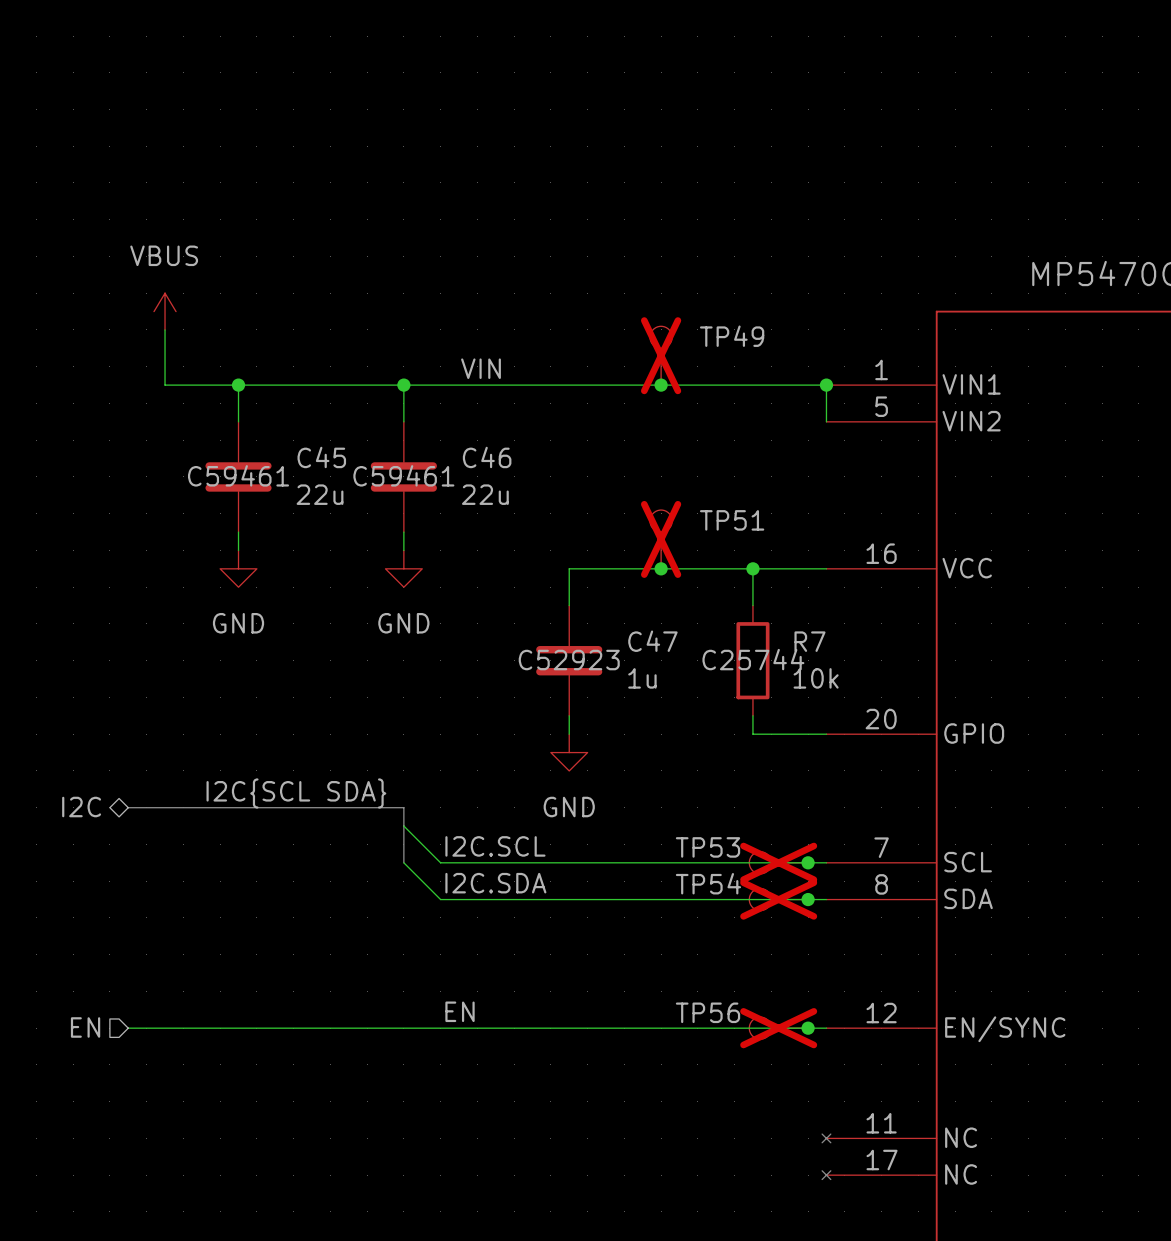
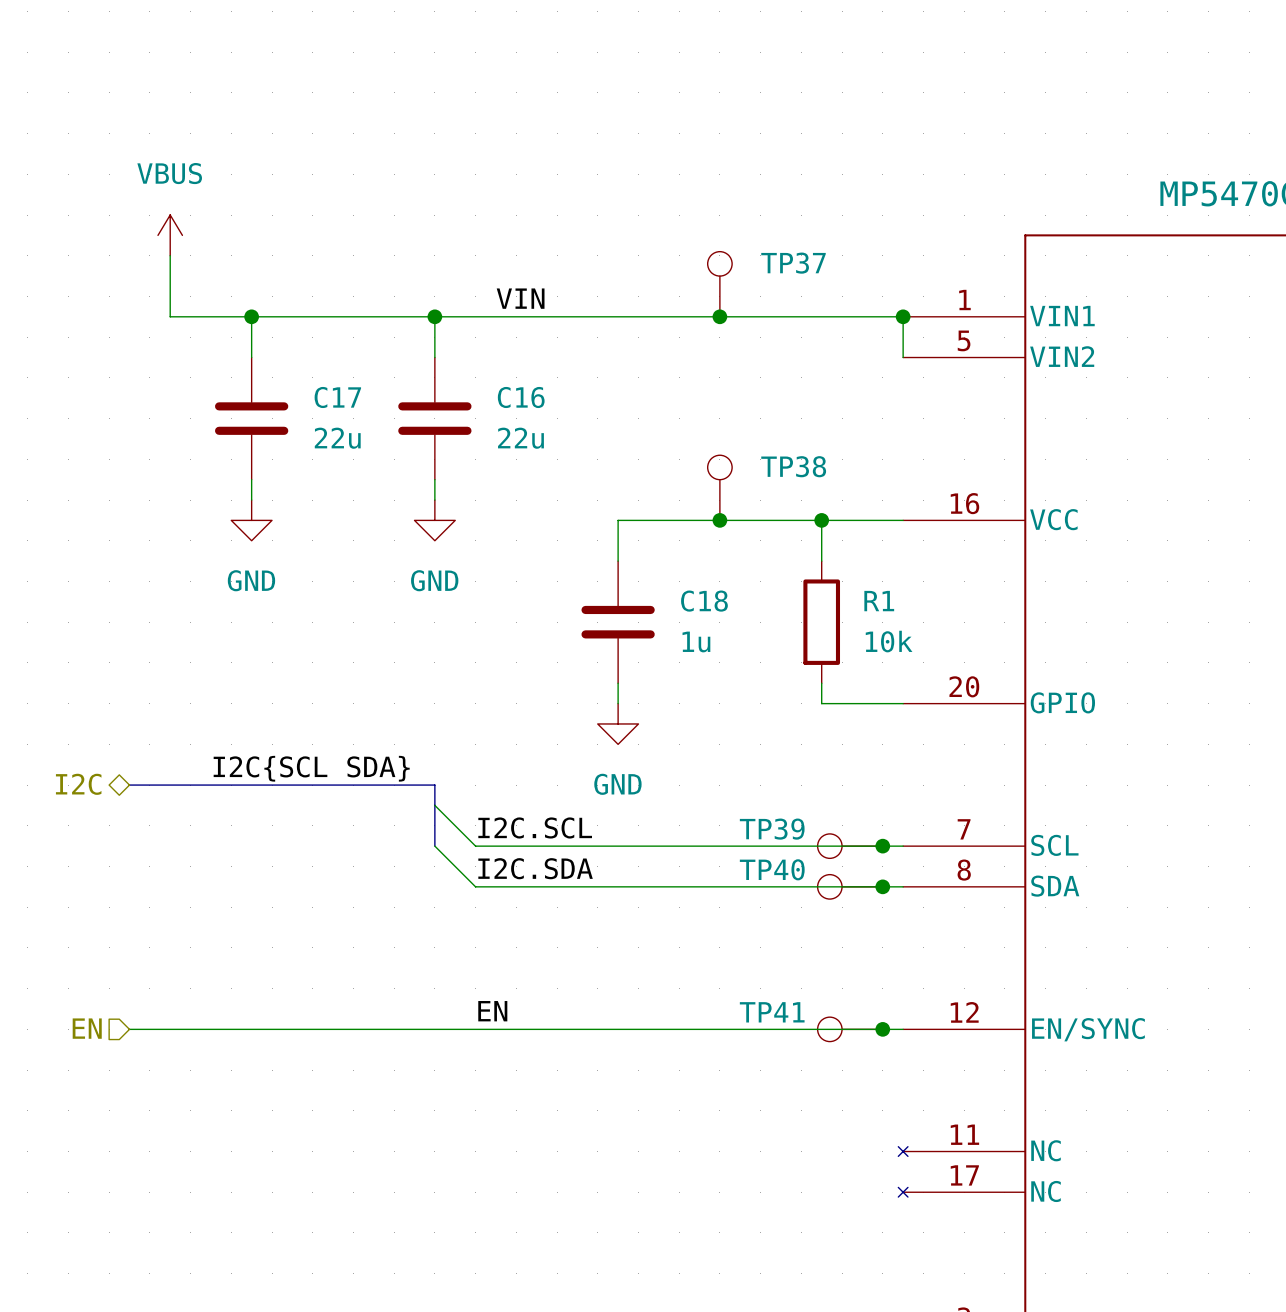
TP49 name: TP49 (732, 336) -> TP37 (793, 263)
TP49 do-not-place cross: (661, 355) -> none
C45 name: C45 (321, 457) -> C17 (337, 397)
C46 name: C46 (487, 457) -> C16 (521, 397)
C45 text: C59461 (238, 475) -> none
C46 text: C59461 (403, 475) -> none
TP51 name: TP51 (732, 520) -> TP38 (793, 466)
TP51 do-not-place cross: (661, 539) -> none
C47 name: C47 (652, 641) -> C18 (704, 601)
R7 name: R7 (809, 641) -> R1 (879, 601)
R7 text: C25744 (753, 659) -> none
C47 text: C52923 (569, 660) -> none
TP53 name: TP53 (708, 847) -> TP39 (772, 829)
TP53 do-not-place cross: (778, 862) -> none
TP54 name: TP54 (708, 883) -> TP40 (772, 869)
TP54 do-not-place cross: (778, 899) -> none
TP56 name: TP56 (708, 1012) -> TP41 (772, 1012)
TP56 do-not-place cross: (778, 1028) -> none

